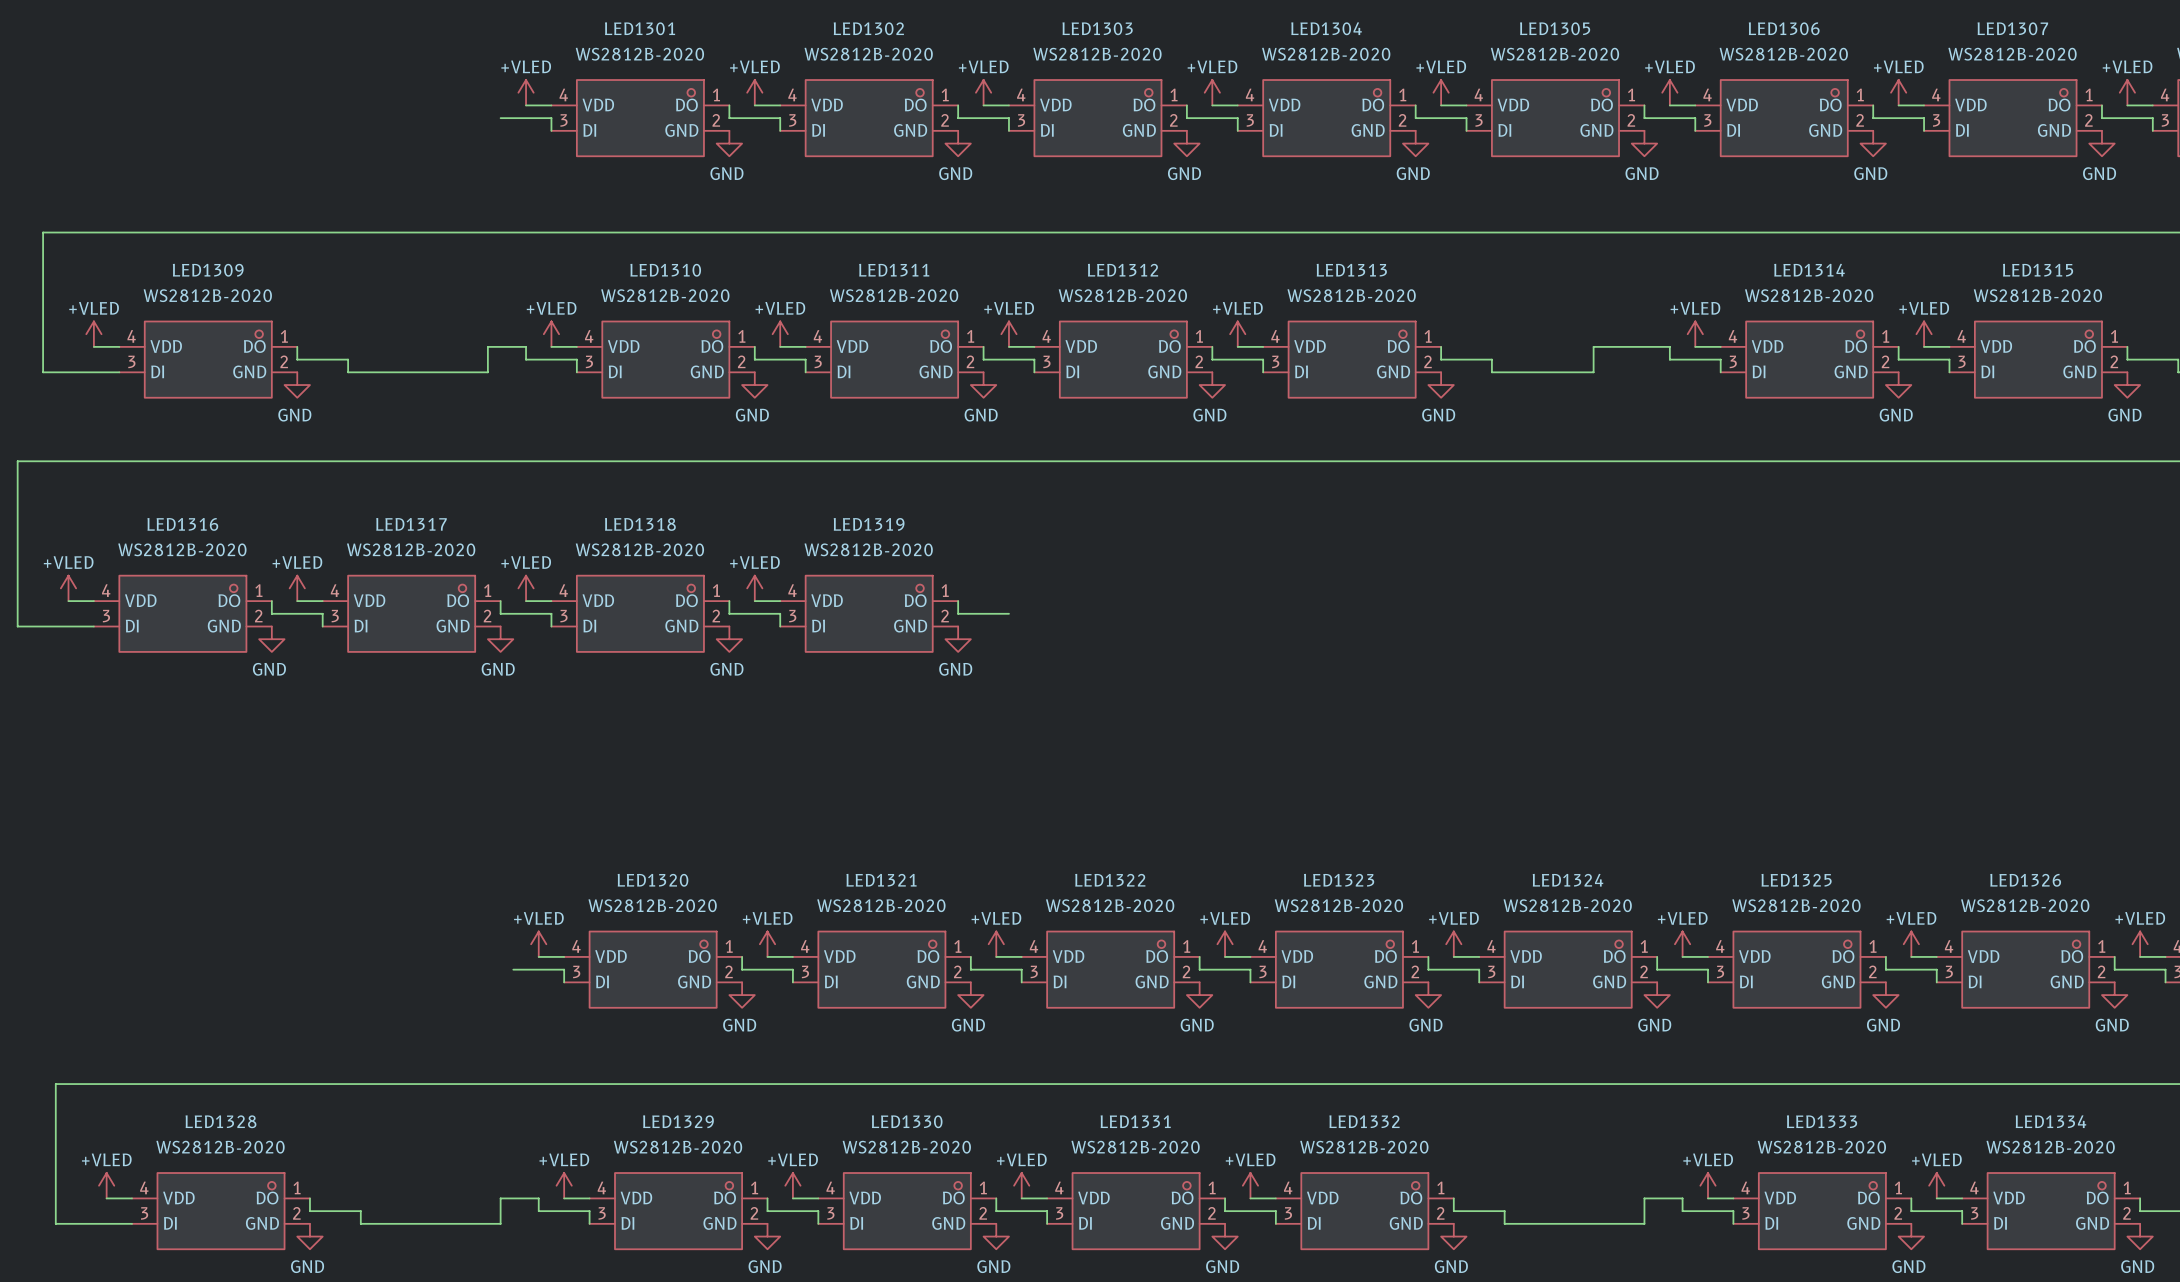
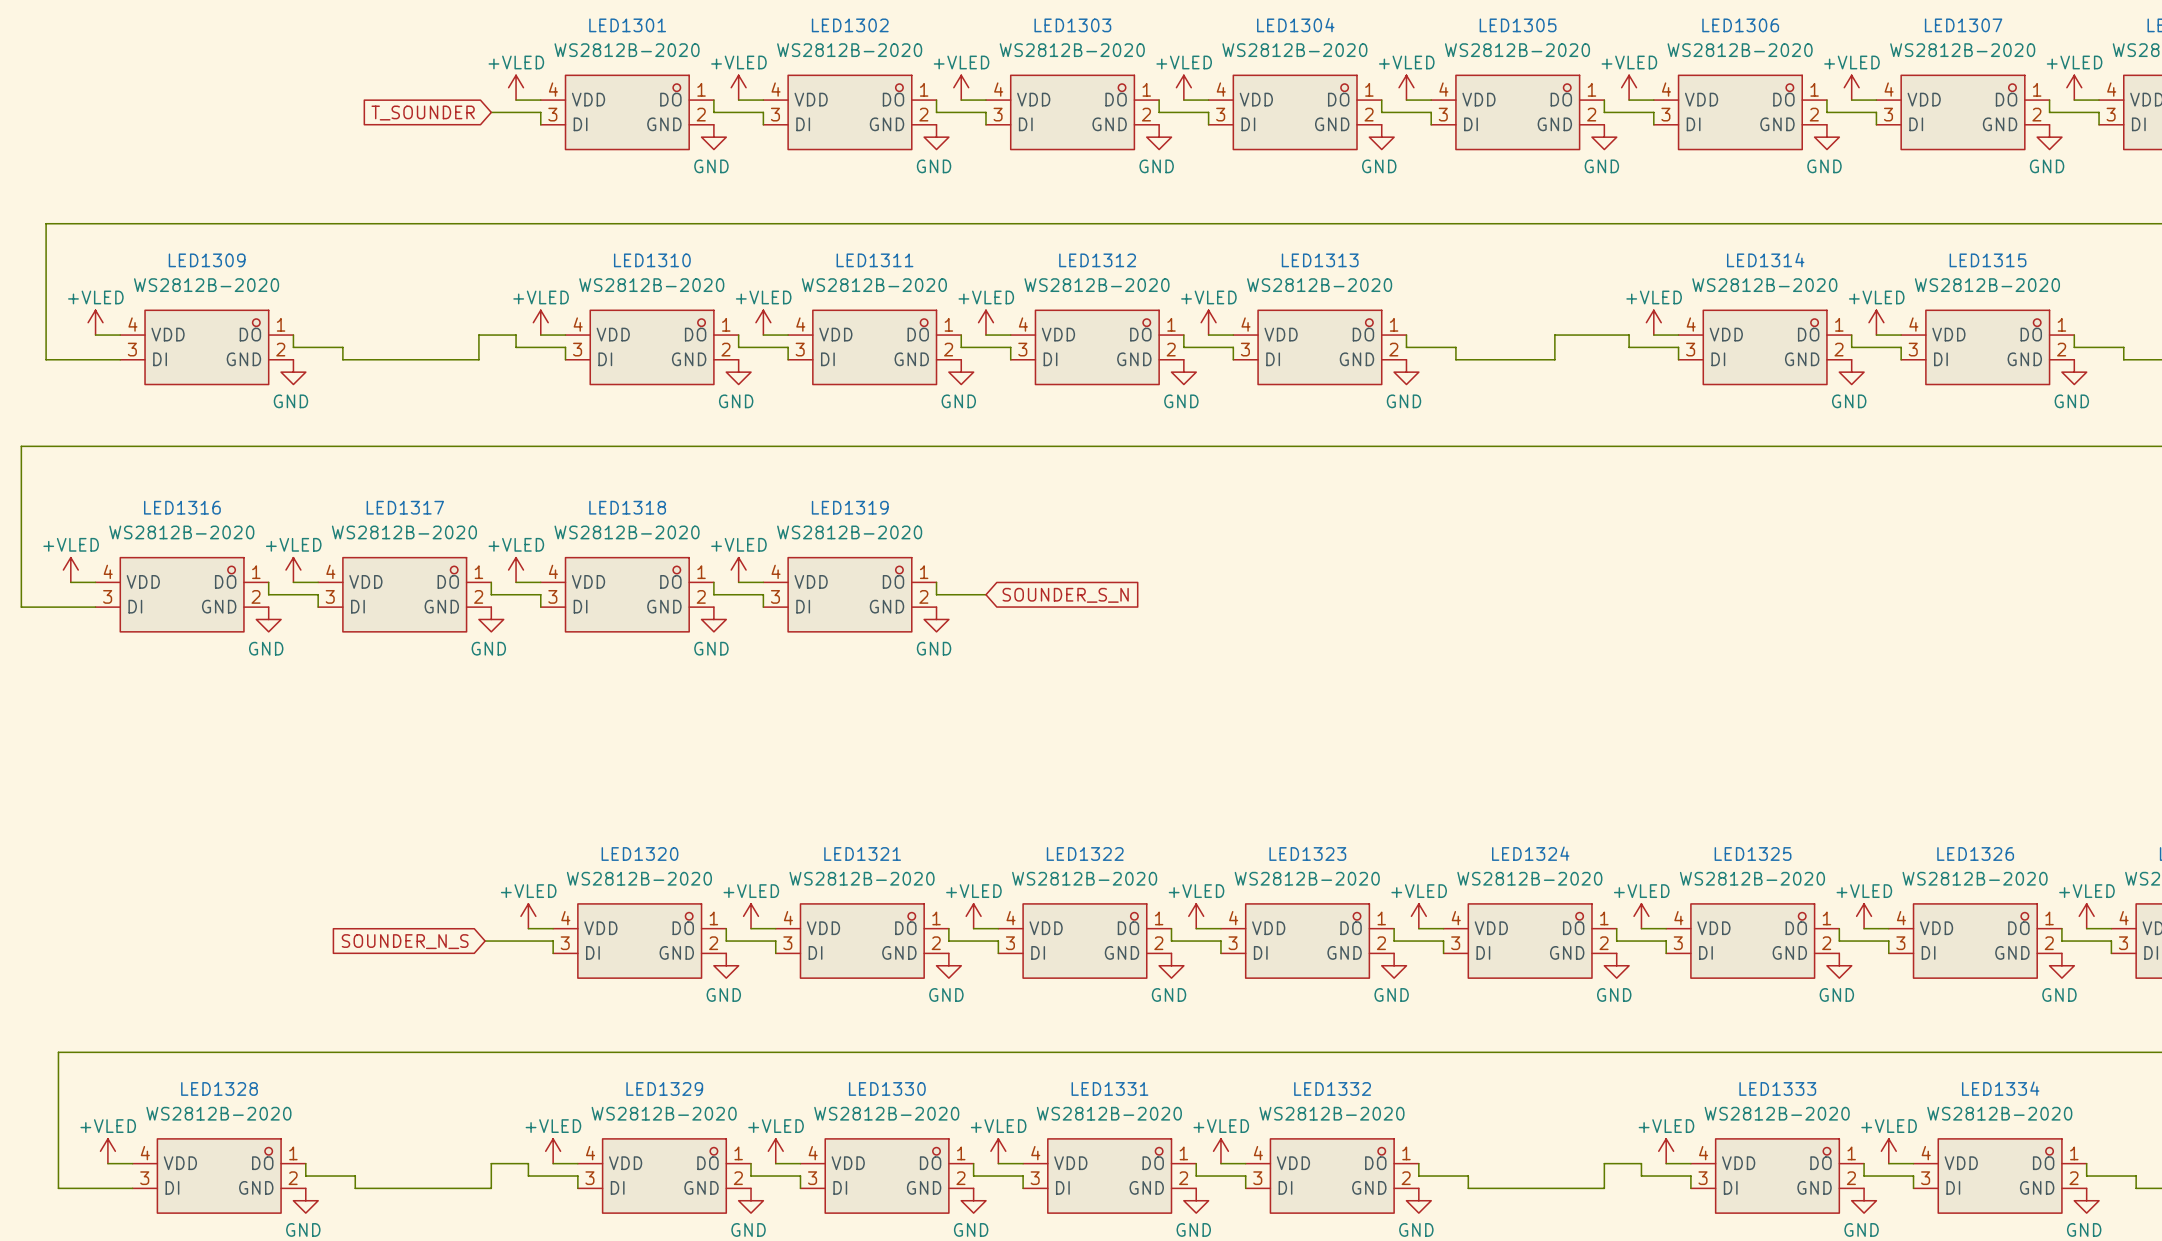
global label: none -> T_SOUNDER (423, 113)
global label: none -> SOUNDER_S_N (1065, 595)
wire: none -> (485, 941) (503, 941)
global label: none -> SOUNDER_N_S (405, 941)

